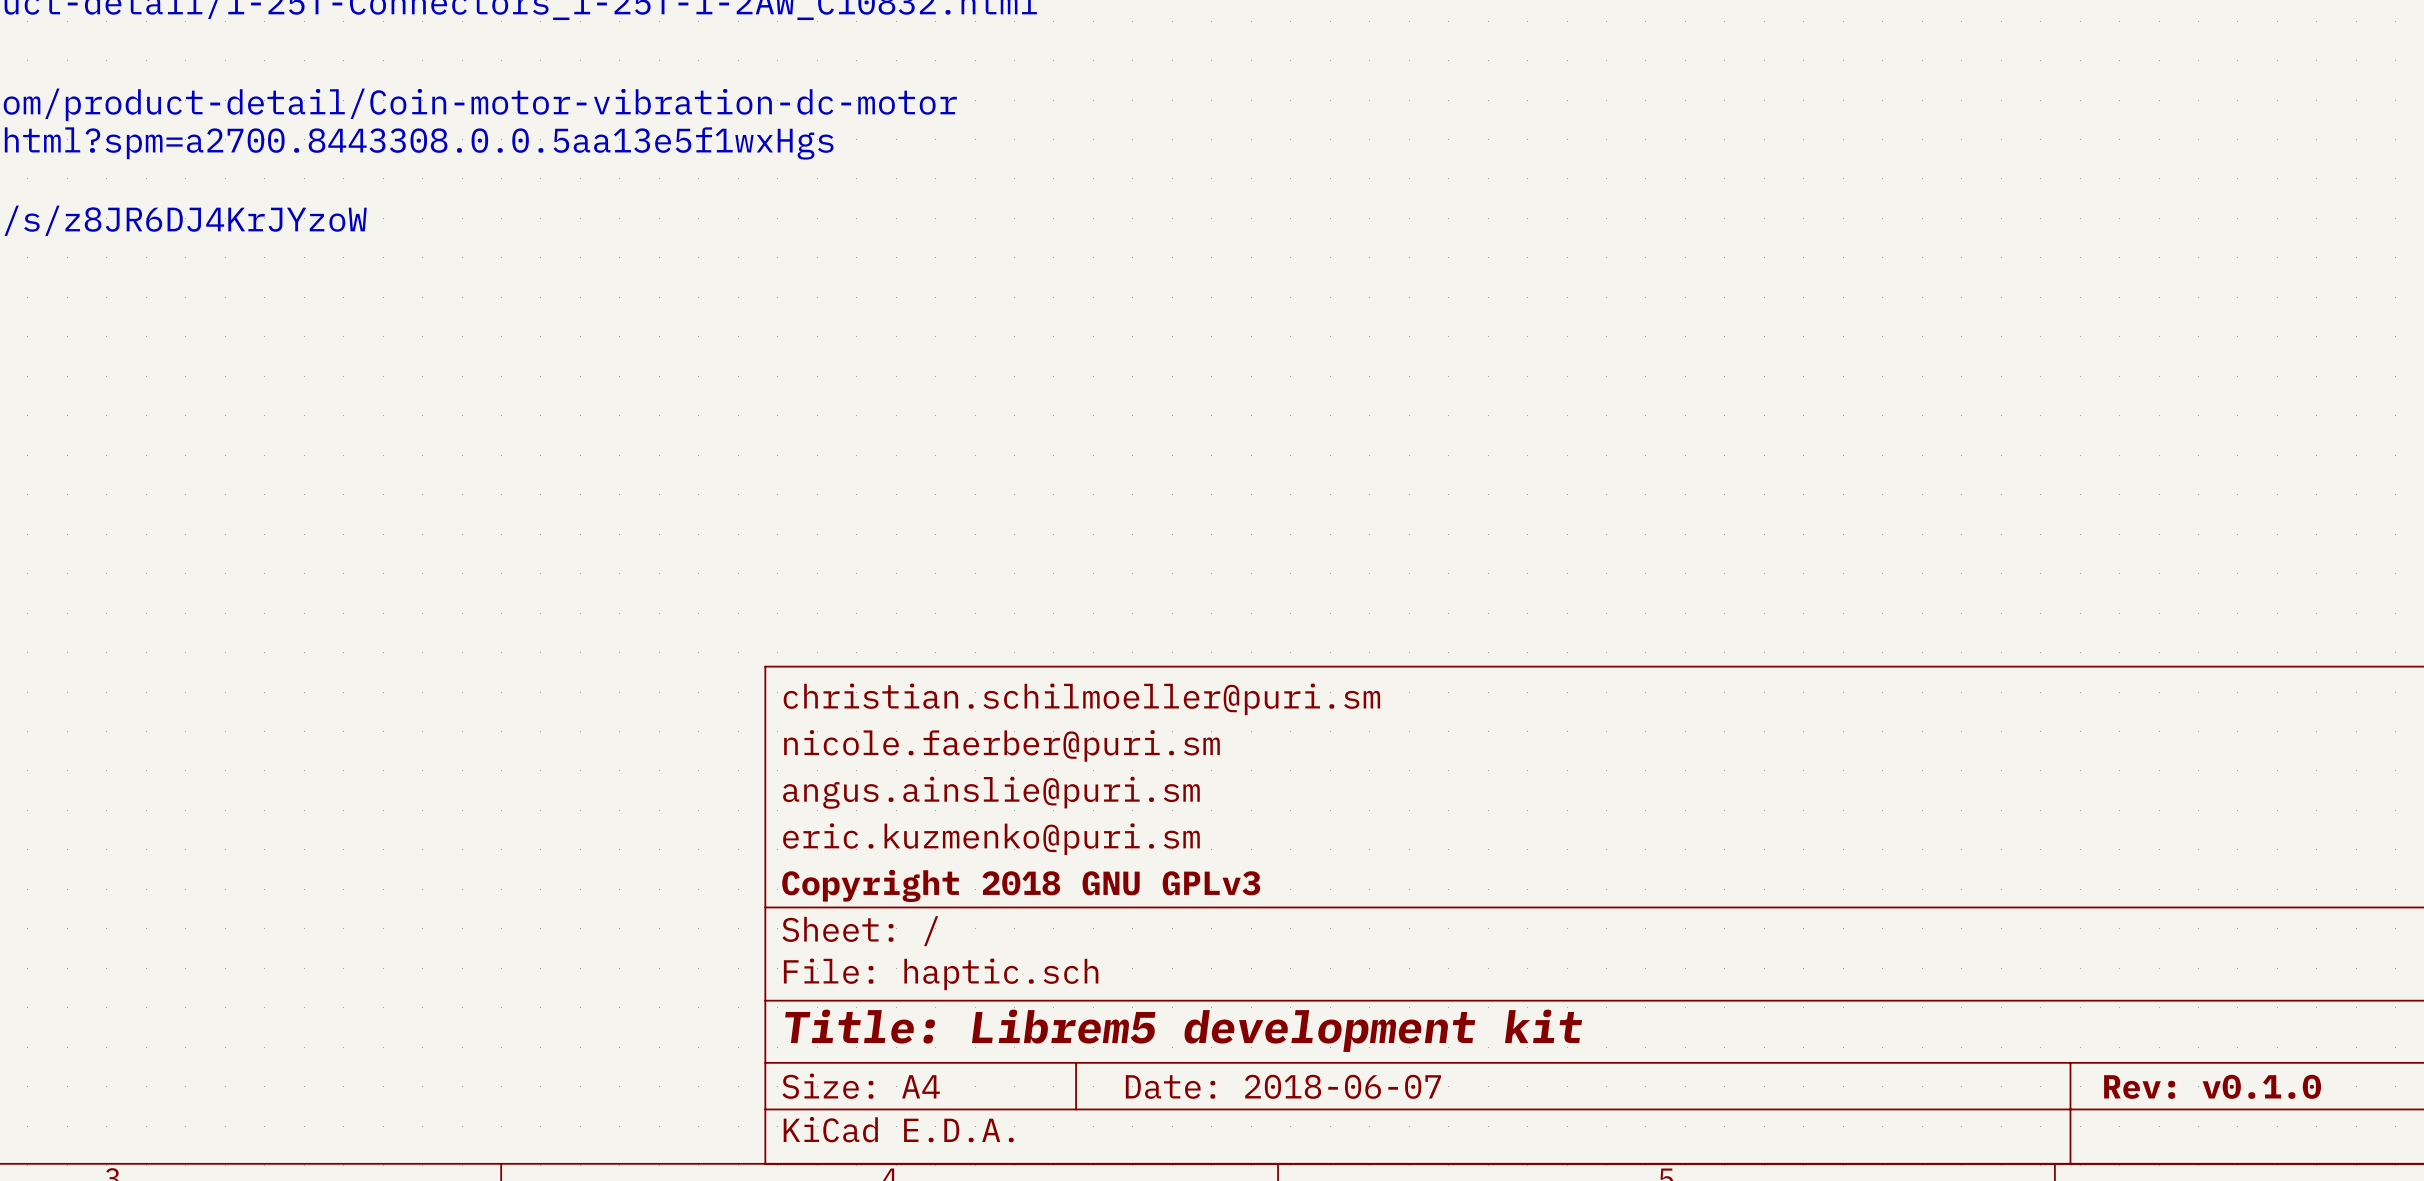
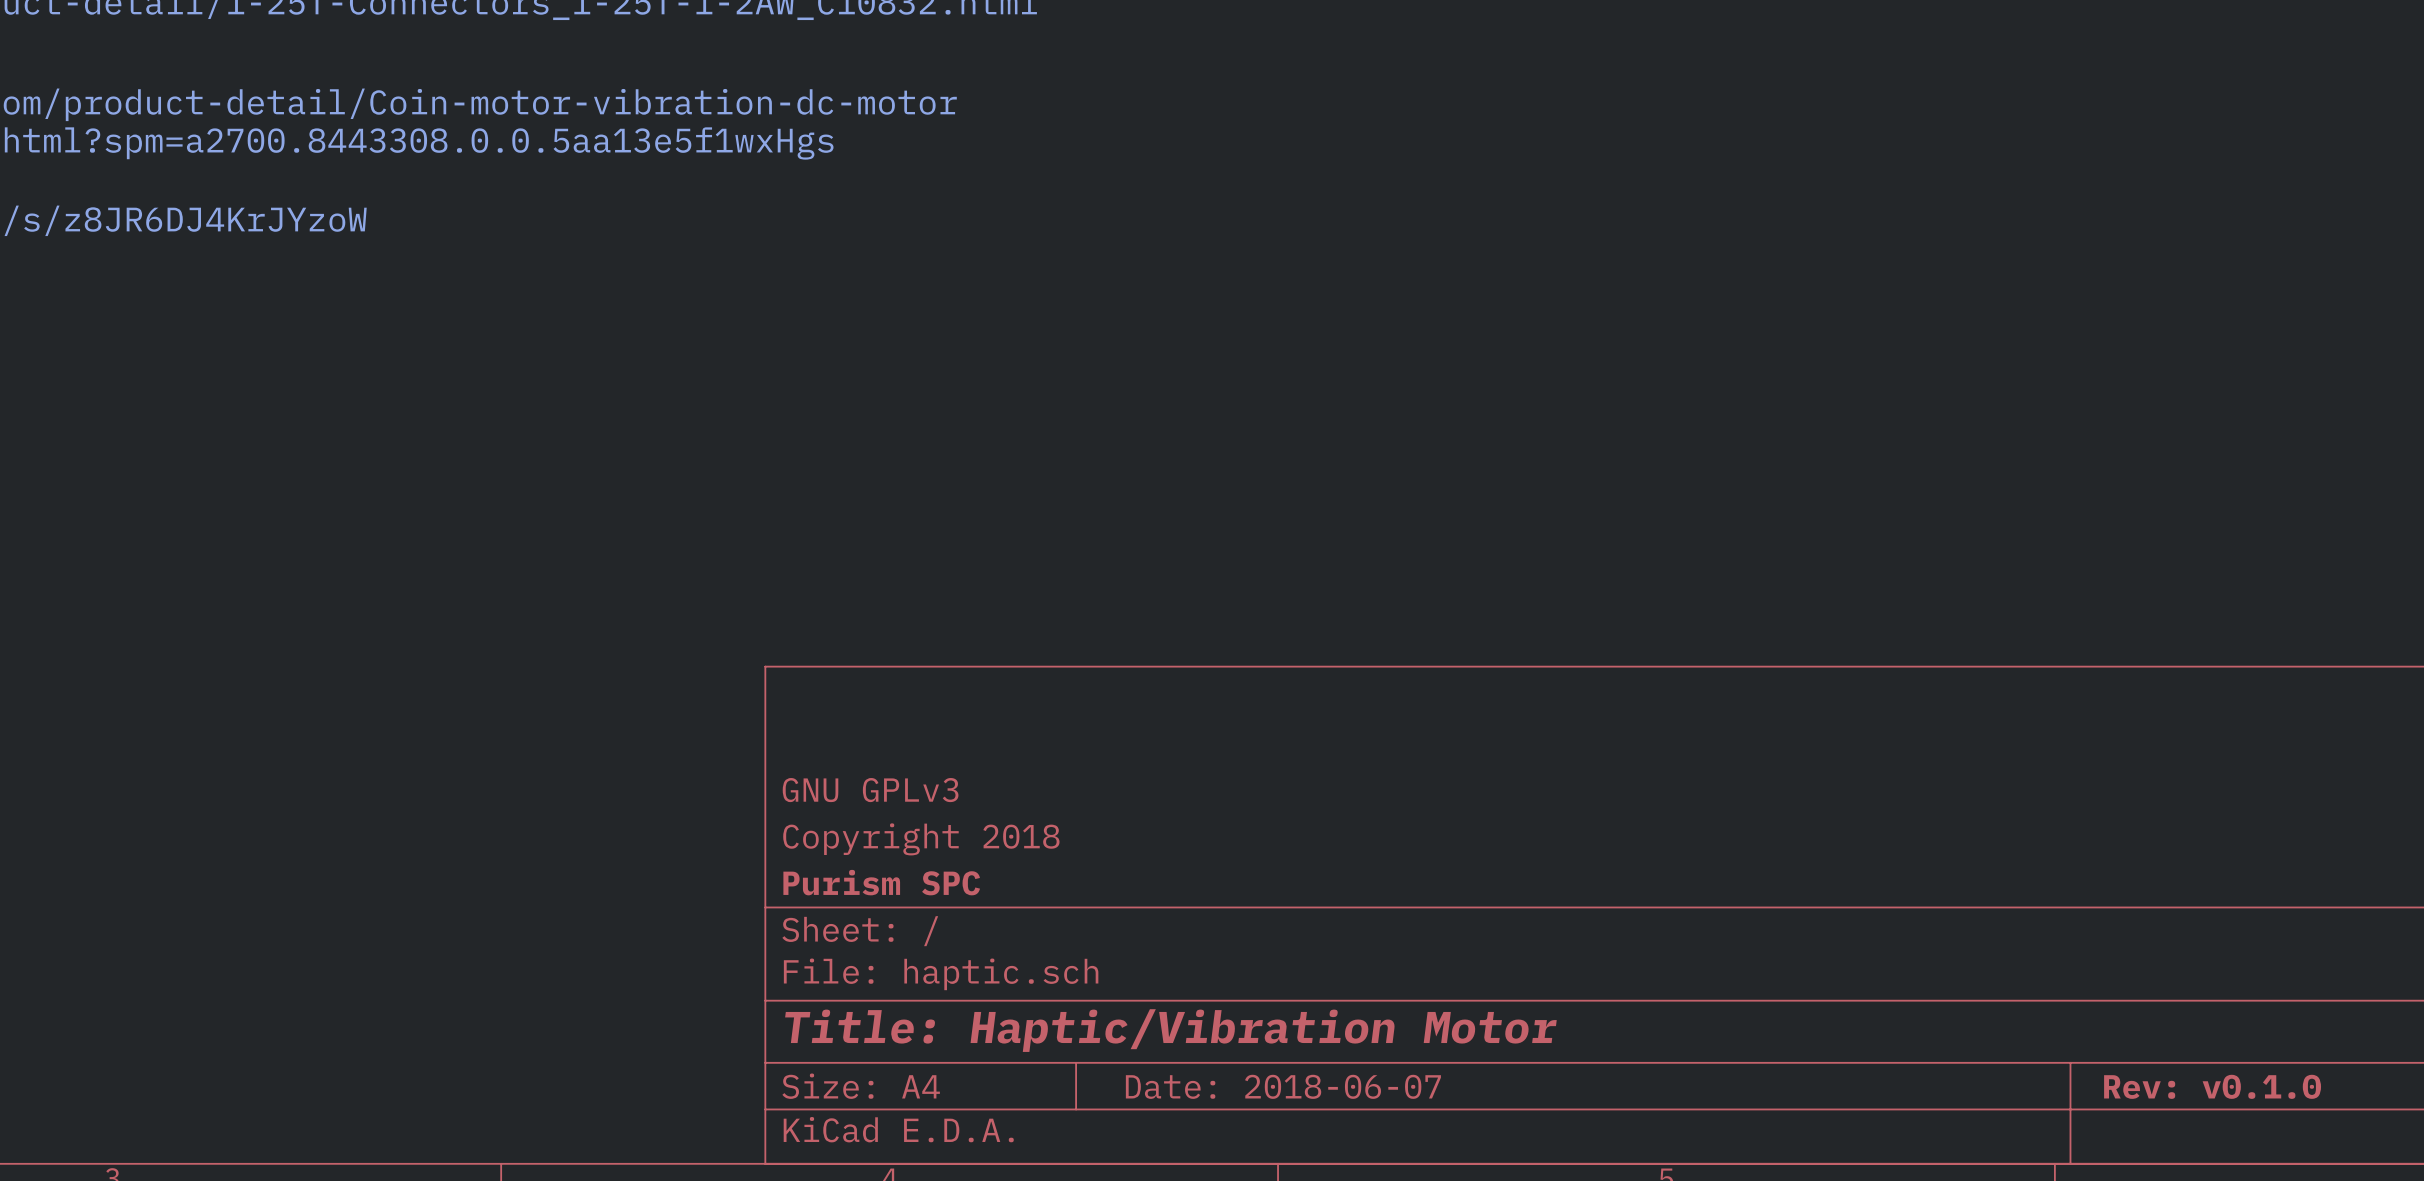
title block: christian.schilmoeller@puri.sm (1081, 699) -> none
title block: nicole.faerber@puri.sm (1001, 745) -> none
title block: angus.ainslie@puri.sm (991, 792) -> GNU GPLv3 (870, 790)
title block: eric.kuzmenko@puri.sm (991, 839) -> Copyright 2018 (921, 839)
title block: Copyright 2018 GNU GPLv3 (1021, 885) -> Purism SPC (881, 882)
title block: Title: Librem5 development kit (1183, 1030) -> Title: Haptic/Vibration Motor (1170, 1030)

